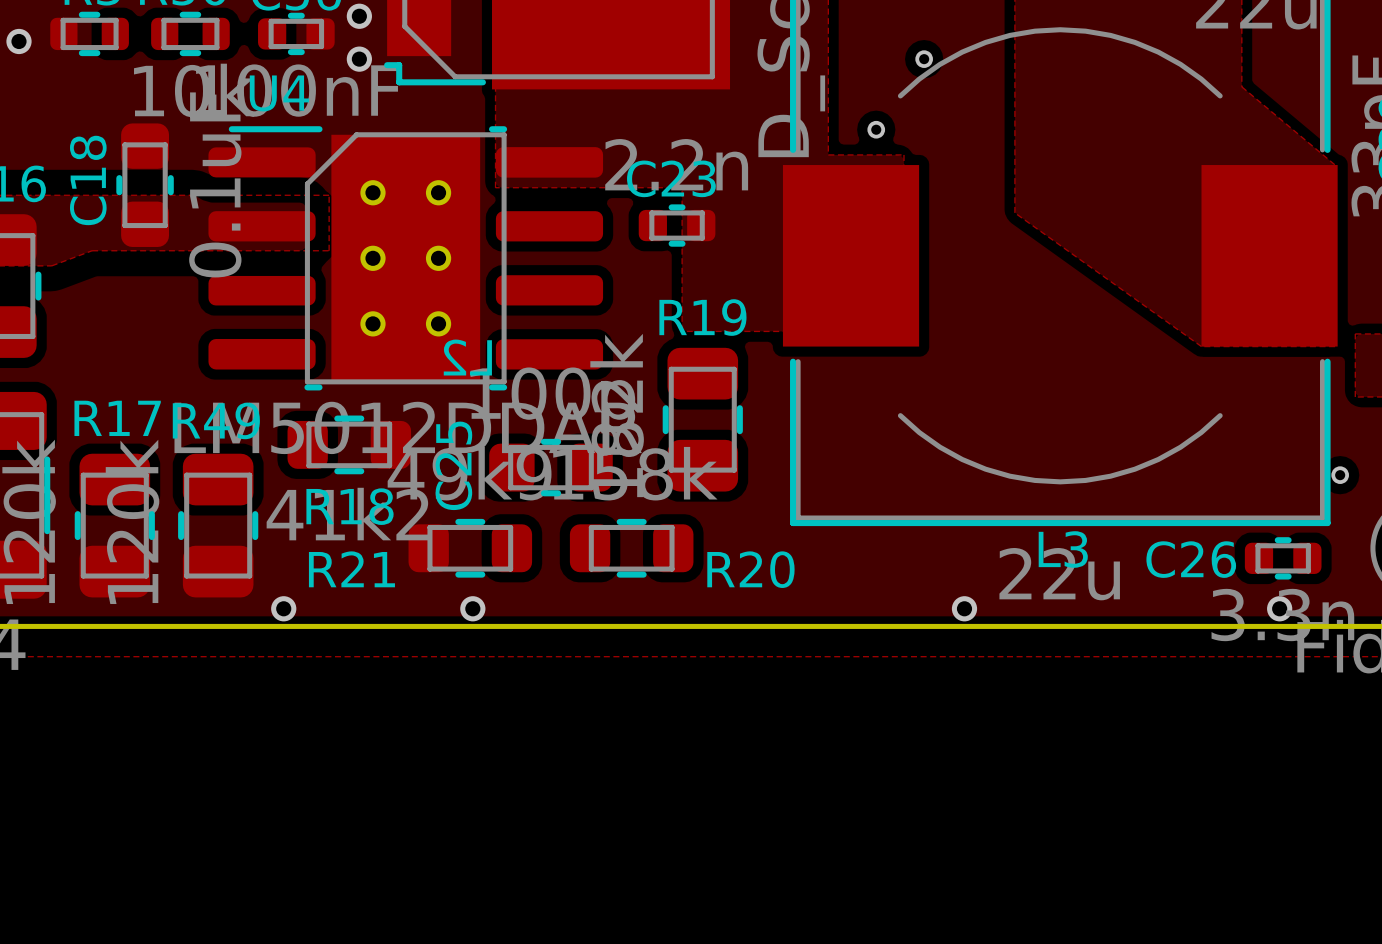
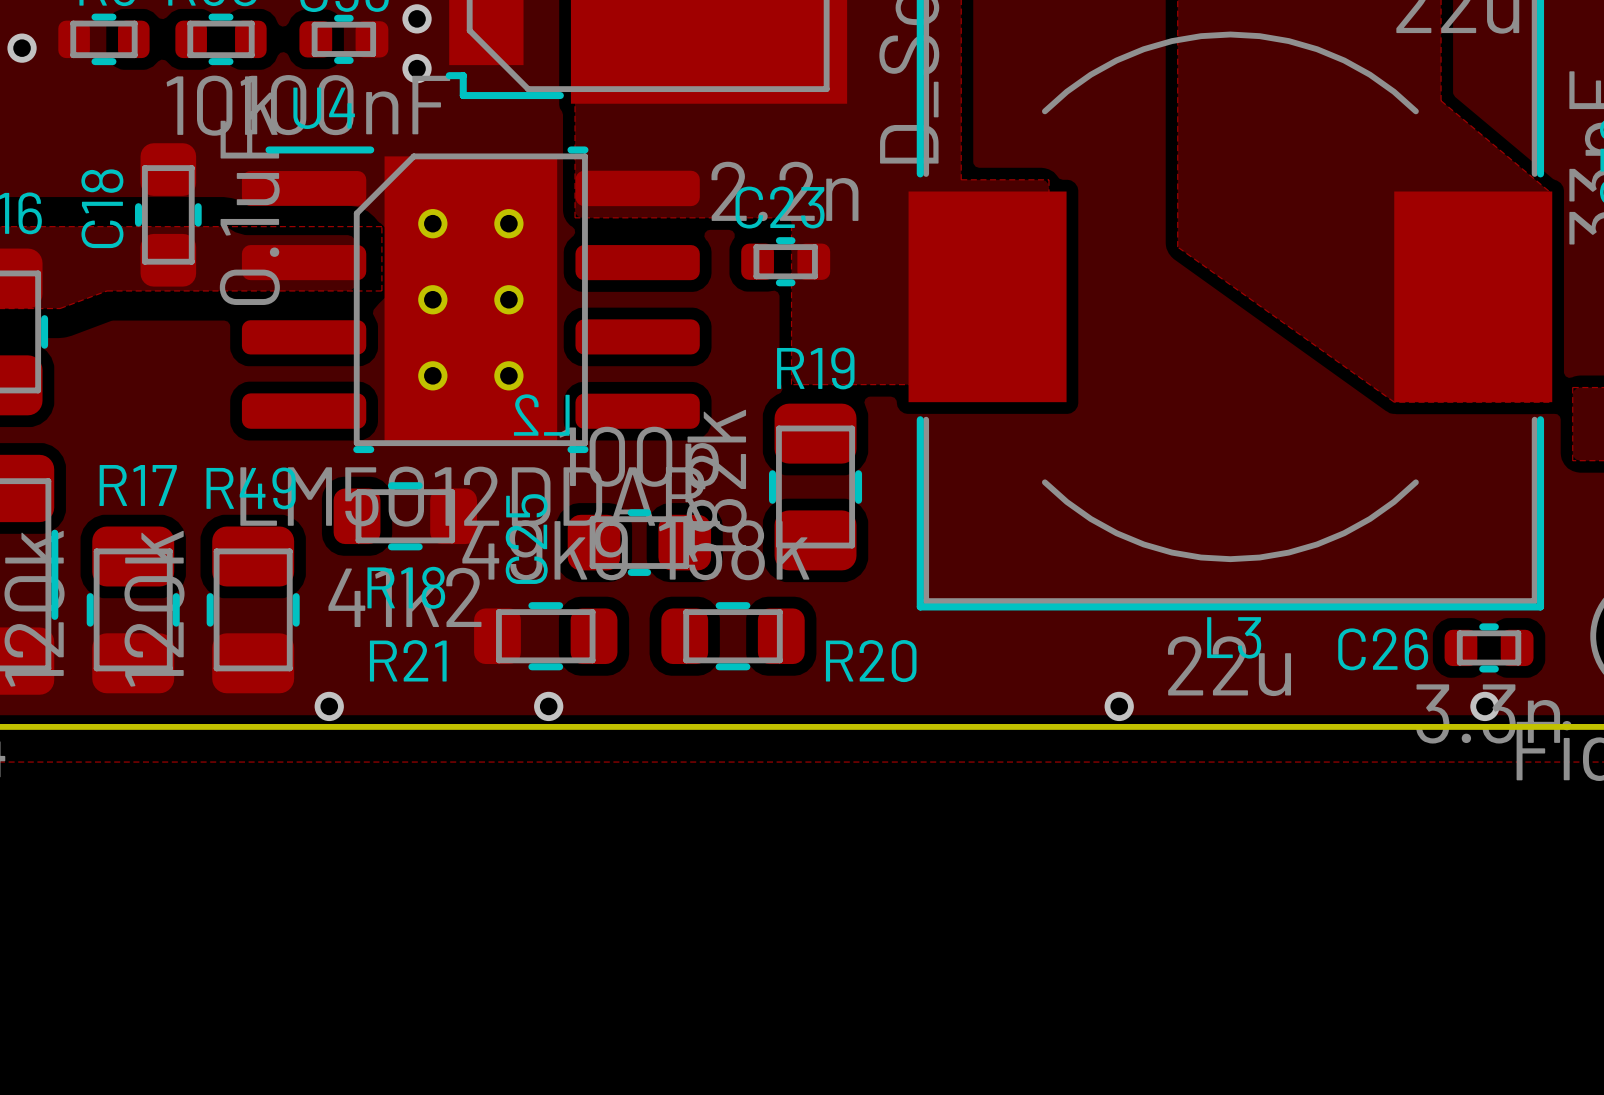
via: (924, 59) -> none
via: (876, 129) -> none
via: (1340, 475) -> none

